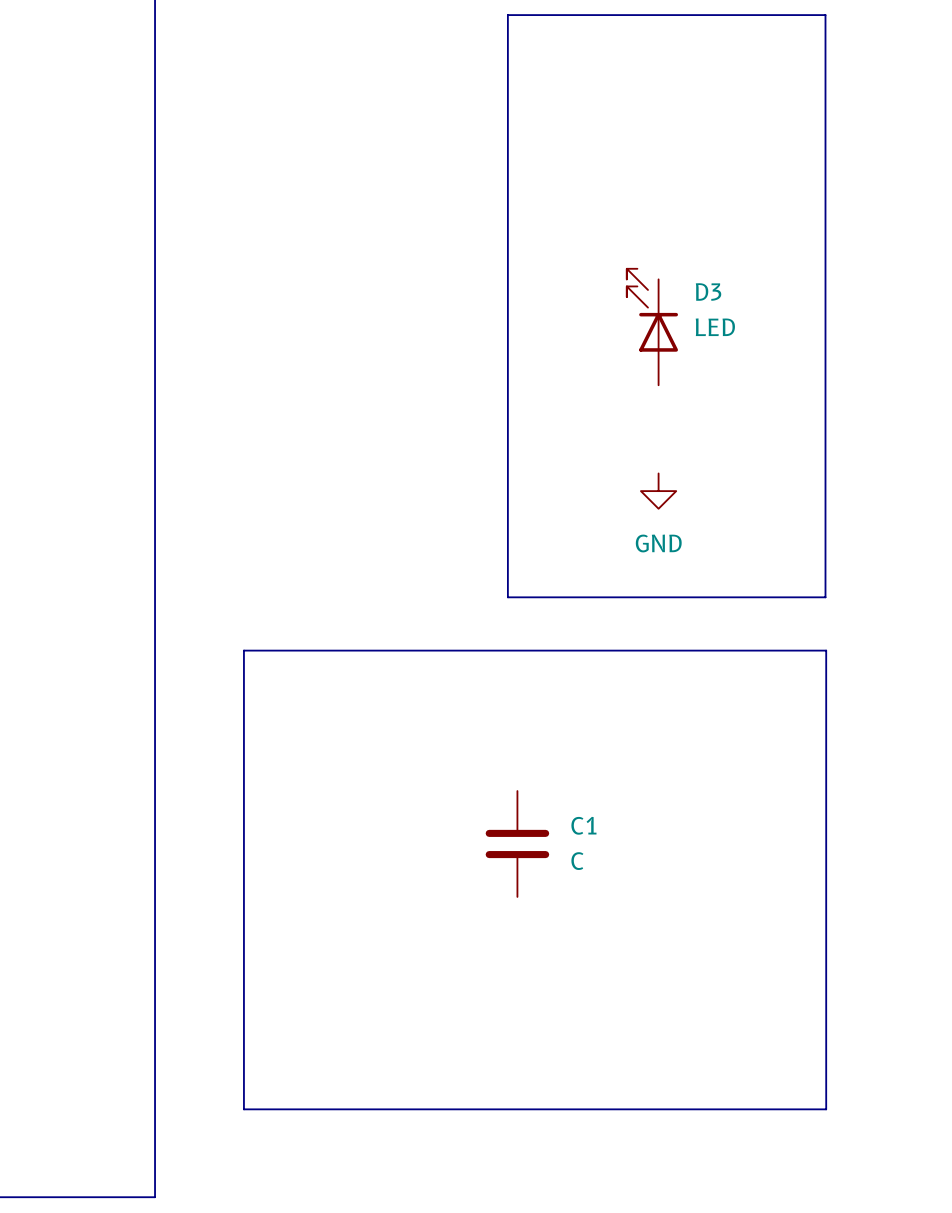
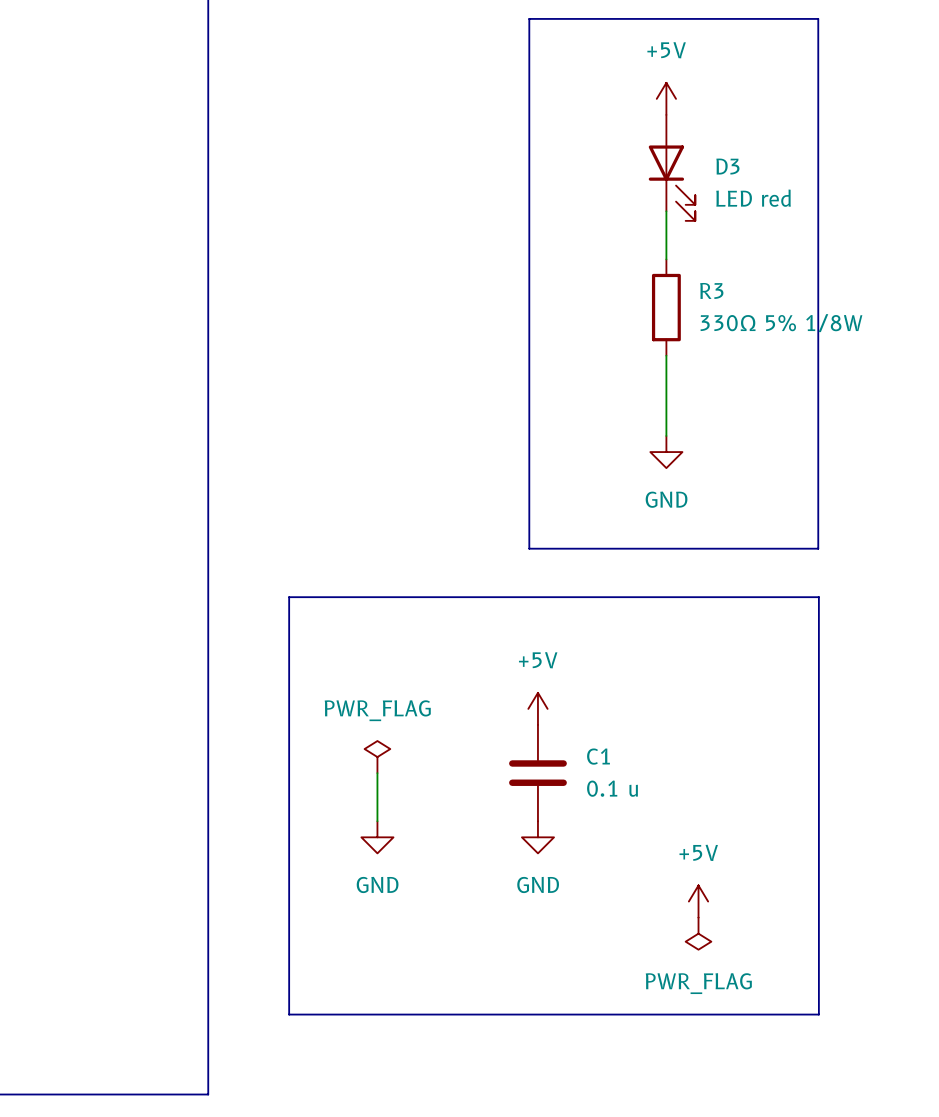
power symbol: none -> +5V (666, 98)
wire: none -> (666, 211) (666, 259)
D3 name position: D3 (708, 292) -> D3 (727, 166)
D3 rotation: 0° (652, 310) -> 180° (672, 183)
D3 position: (652, 327) -> (672, 167)
D3 value: LED (715, 327) -> LED red (753, 198)
R3: none -> 330Ω 5% 1/8W (666, 307)
wire: none -> (666, 355) (666, 436)
power symbol: none -> +5V (537, 708)
power symbol: none -> PWR_FLAG (377, 757)
wire: none -> (377, 773) (377, 821)
C1 value: C (577, 861) -> 0.1 u (612, 788)
power symbol: none -> GND (377, 837)
power symbol: none -> GND (537, 837)
power symbol: none -> +5V (698, 901)
power symbol: none -> PWR_FLAG (698, 933)

